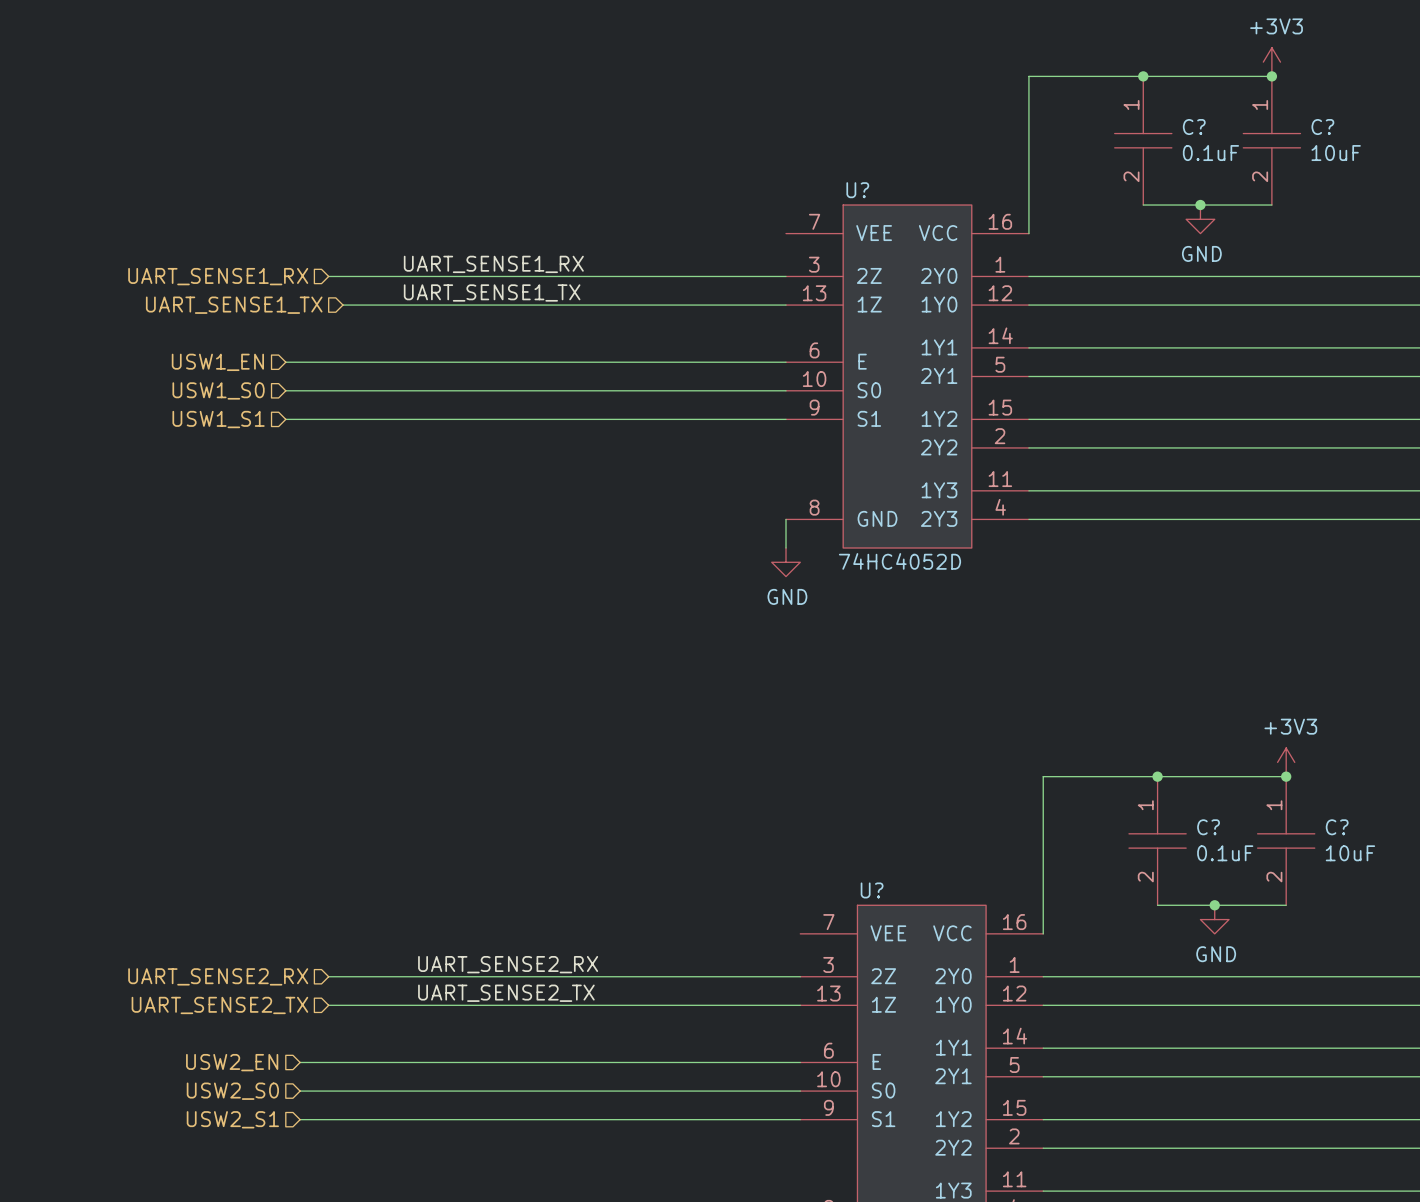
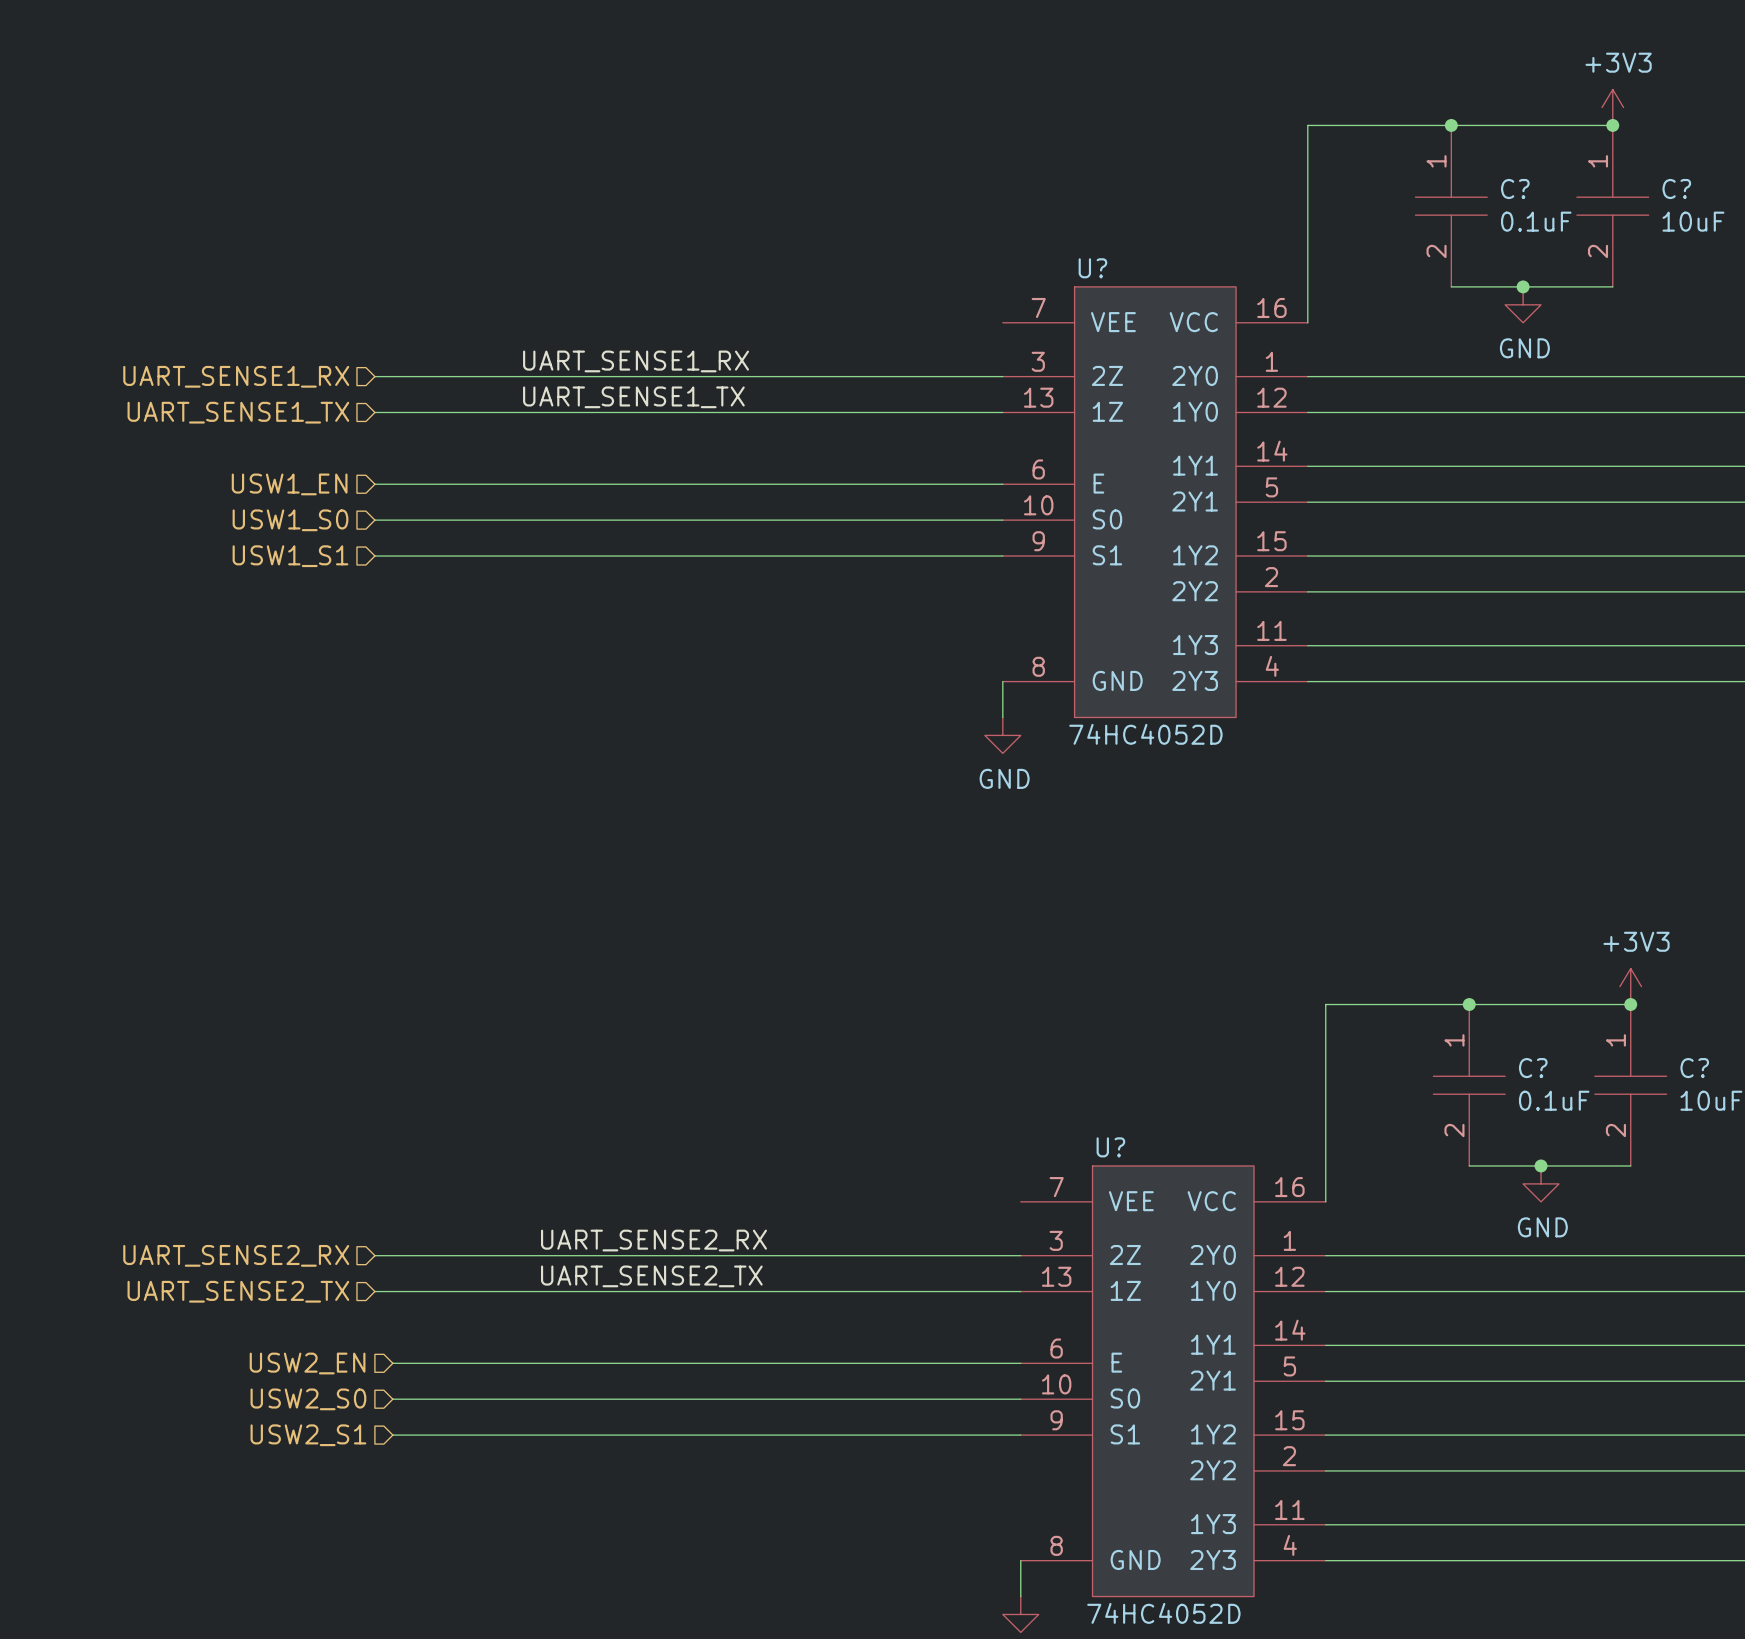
hierarchical label position: UART_SENSE1_RX (218, 276) -> UART_SENSE1_RX (236, 376)
wire: none -> (374, 376) (428, 376)
hierarchical label position: UART_SENSE1_TX (234, 305) -> UART_SENSE1_TX (238, 412)
wire: none -> (374, 412) (446, 412)
hierarchical label position: UART_SENSE2_RX (218, 976) -> UART_SENSE2_RX (236, 1255)
wire: none -> (374, 1255) (428, 1255)
hierarchical label position: UART_SENSE2_TX (219, 1005) -> UART_SENSE2_TX (238, 1291)
wire: none -> (374, 1291) (428, 1291)

